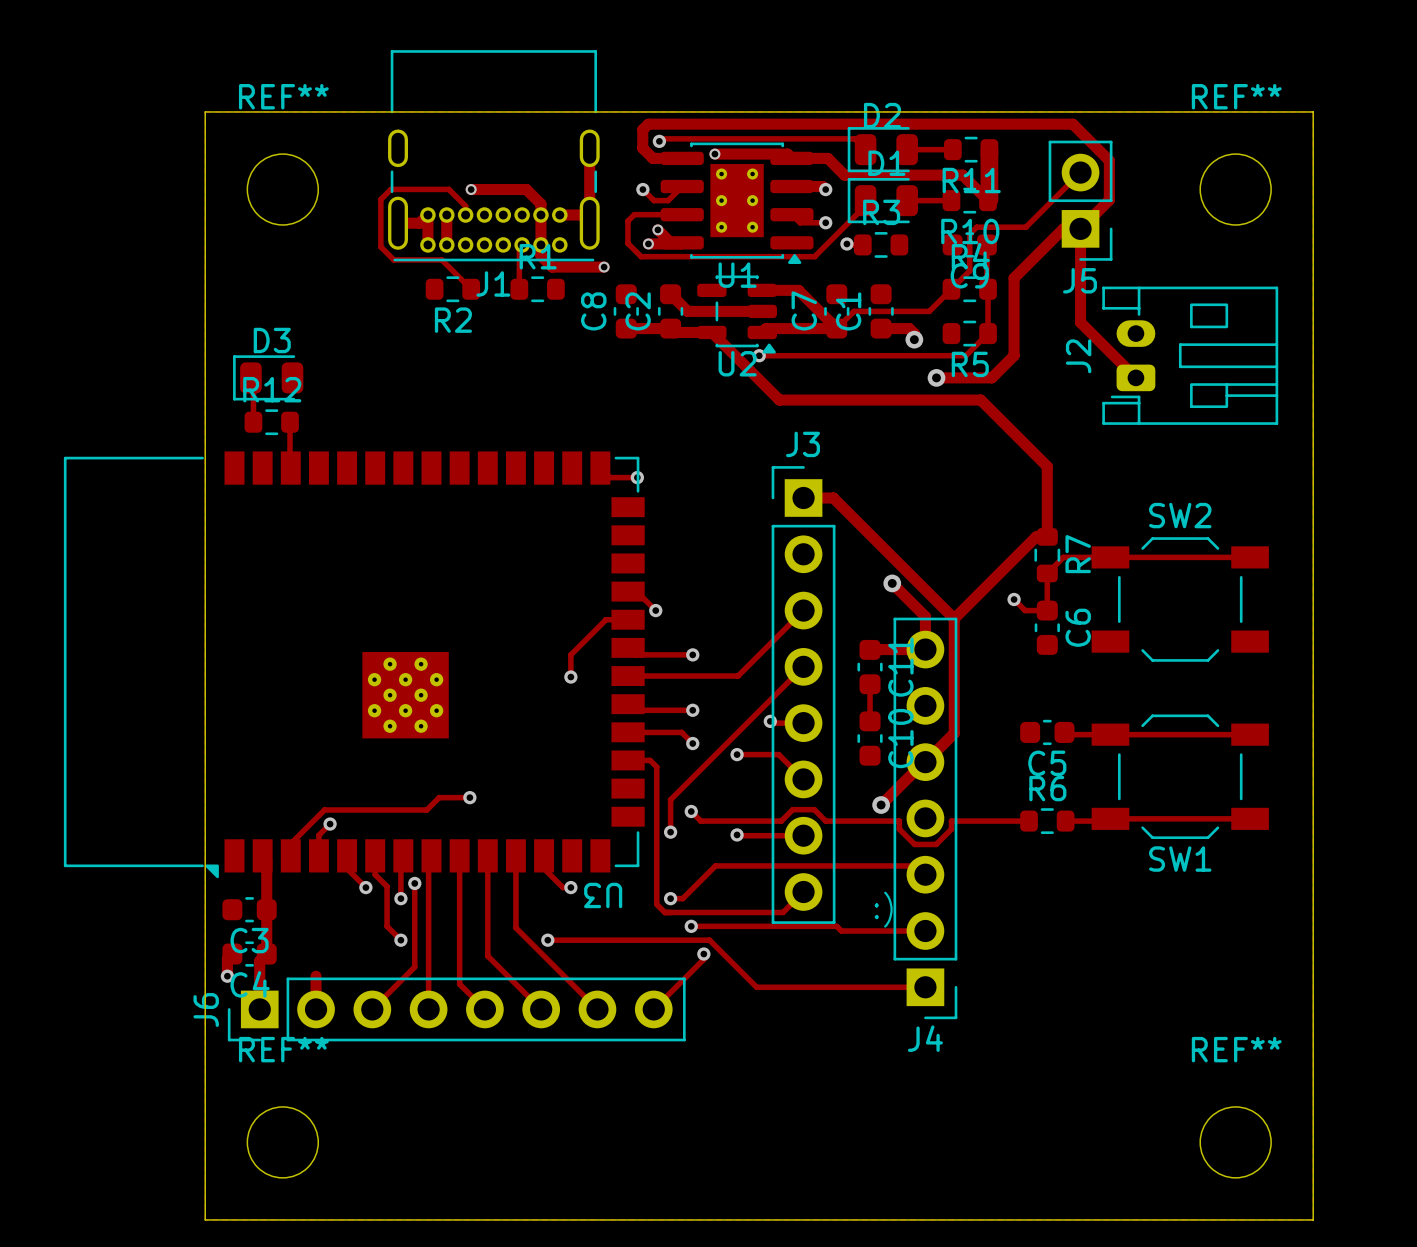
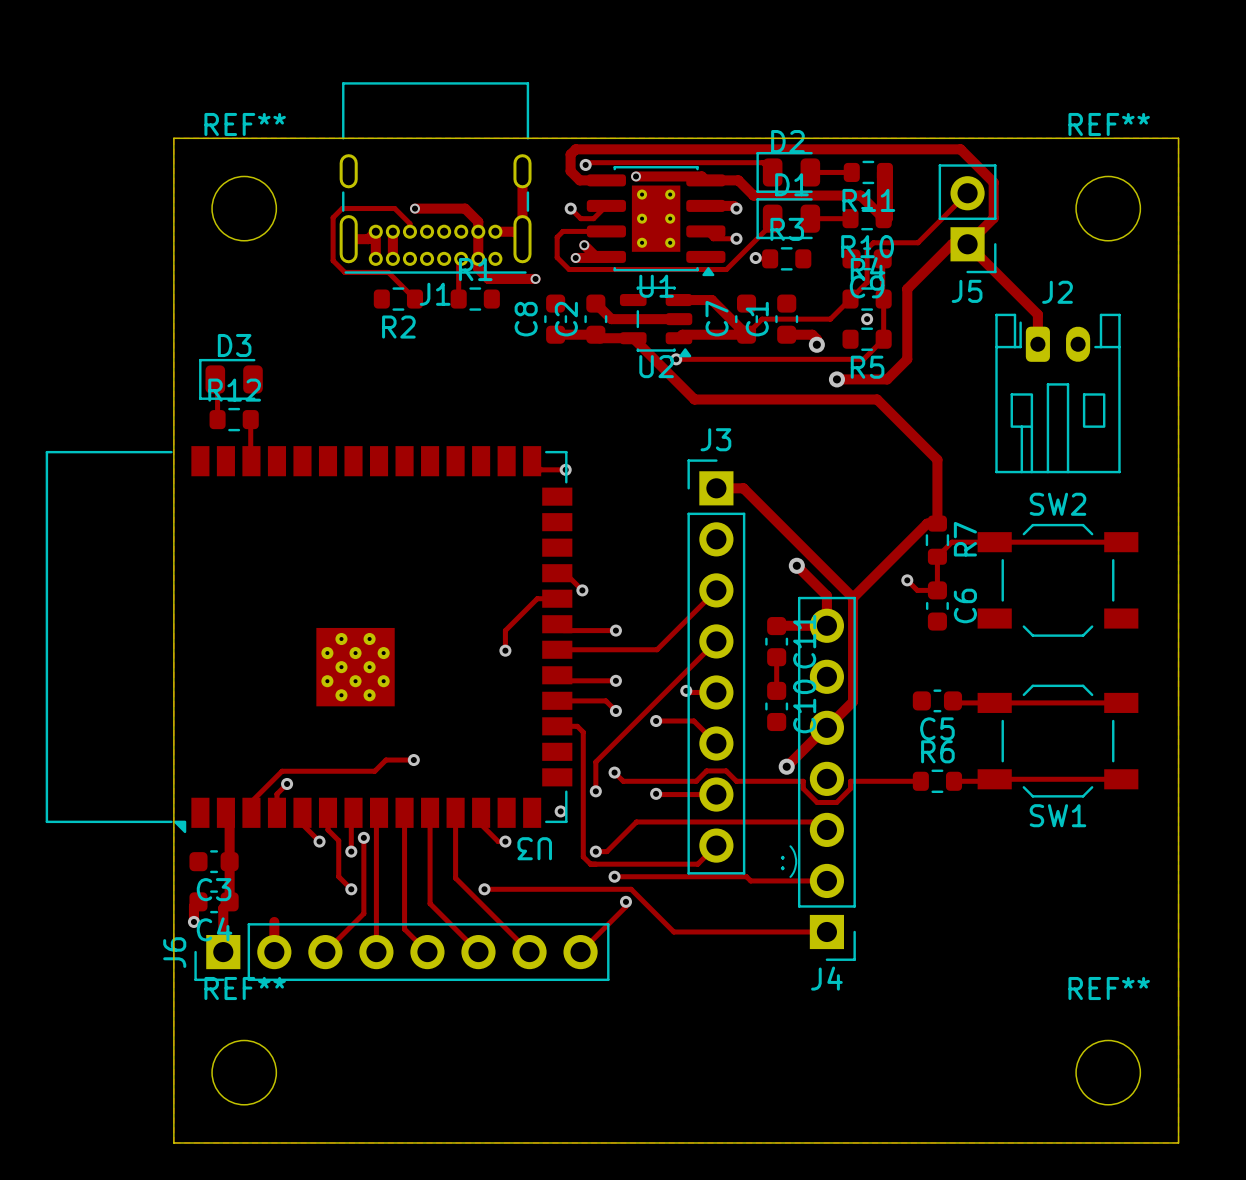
track: (1080, 228) (1080, 322) (1135, 377) -> (967, 244) (1037, 314) (1037, 344)
via: none -> (867, 319)
J2 rotation: 0° (1190, 355) -> 90° clockwise (1057, 393)
via: none -> (560, 811)

